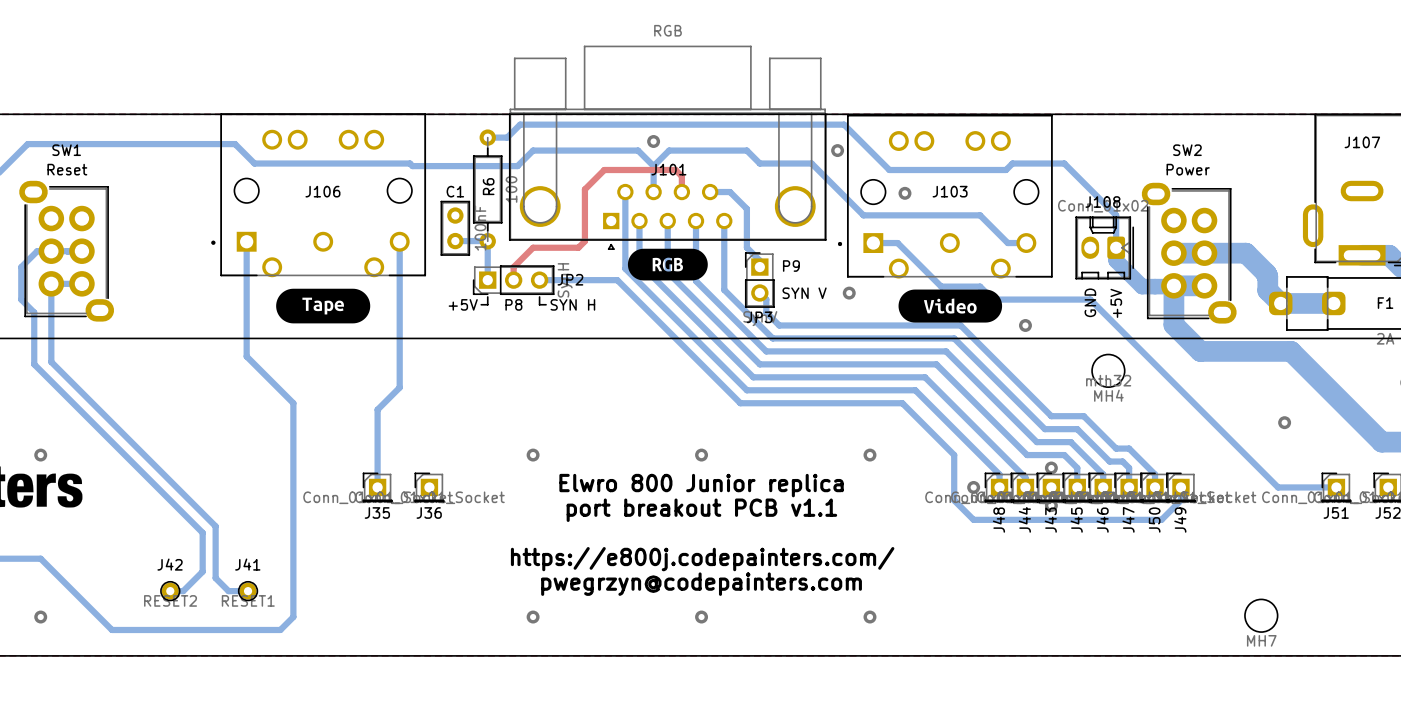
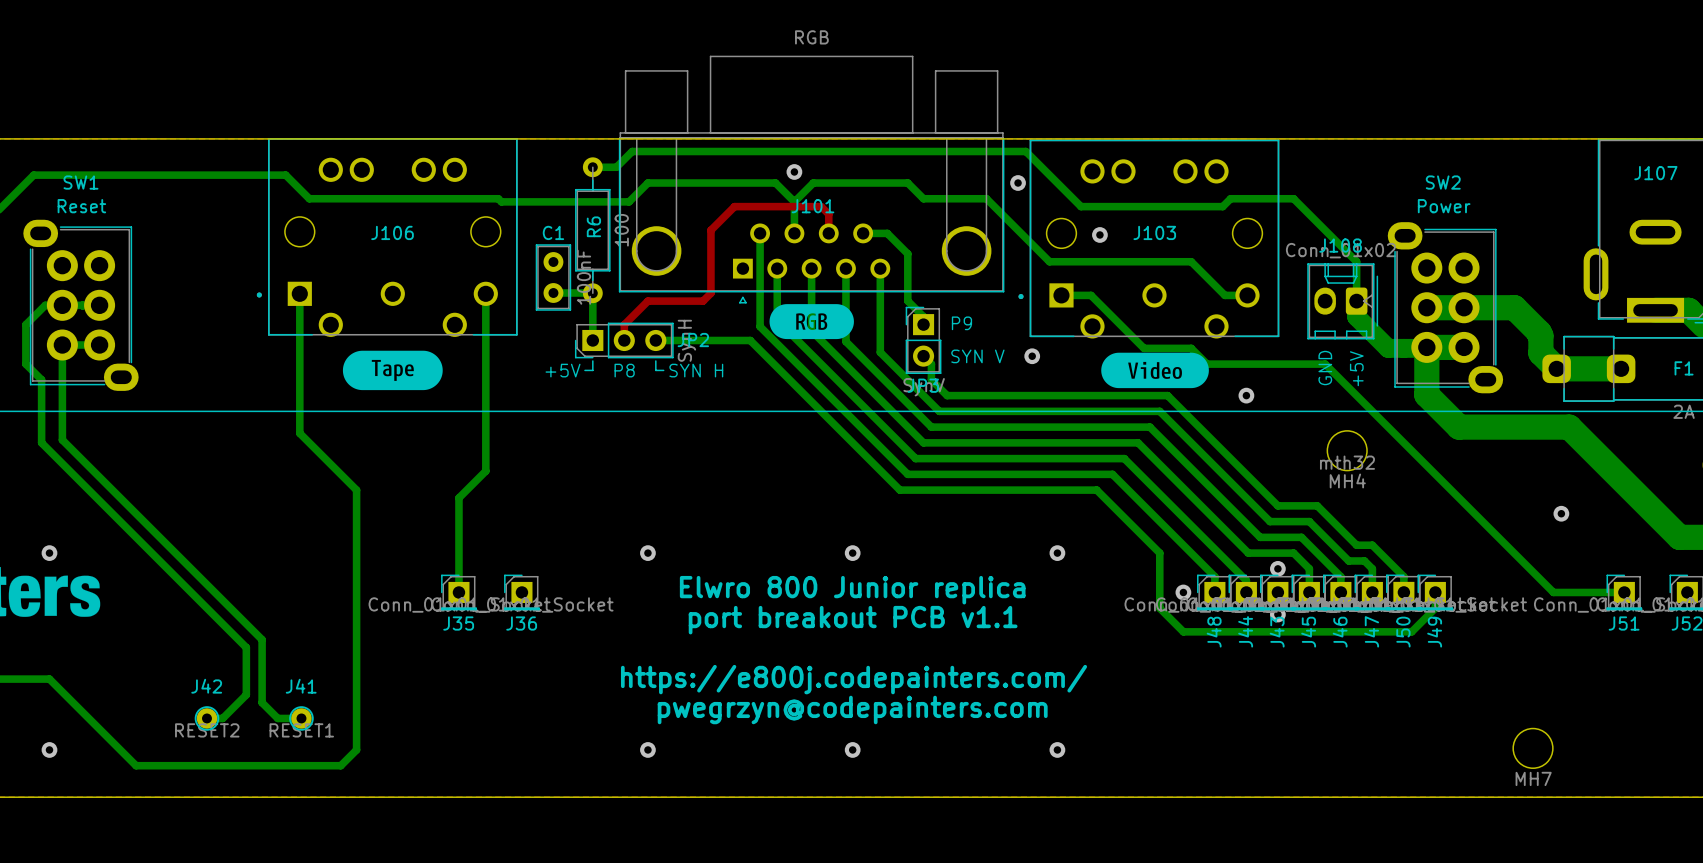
drawing shape: [627, 248, 708, 281] -> [769, 304, 854, 340]
drawing shape: [276, 288, 371, 324] -> [342, 350, 443, 391]
drawing shape: [898, 289, 1003, 323] -> [1101, 352, 1209, 389]

